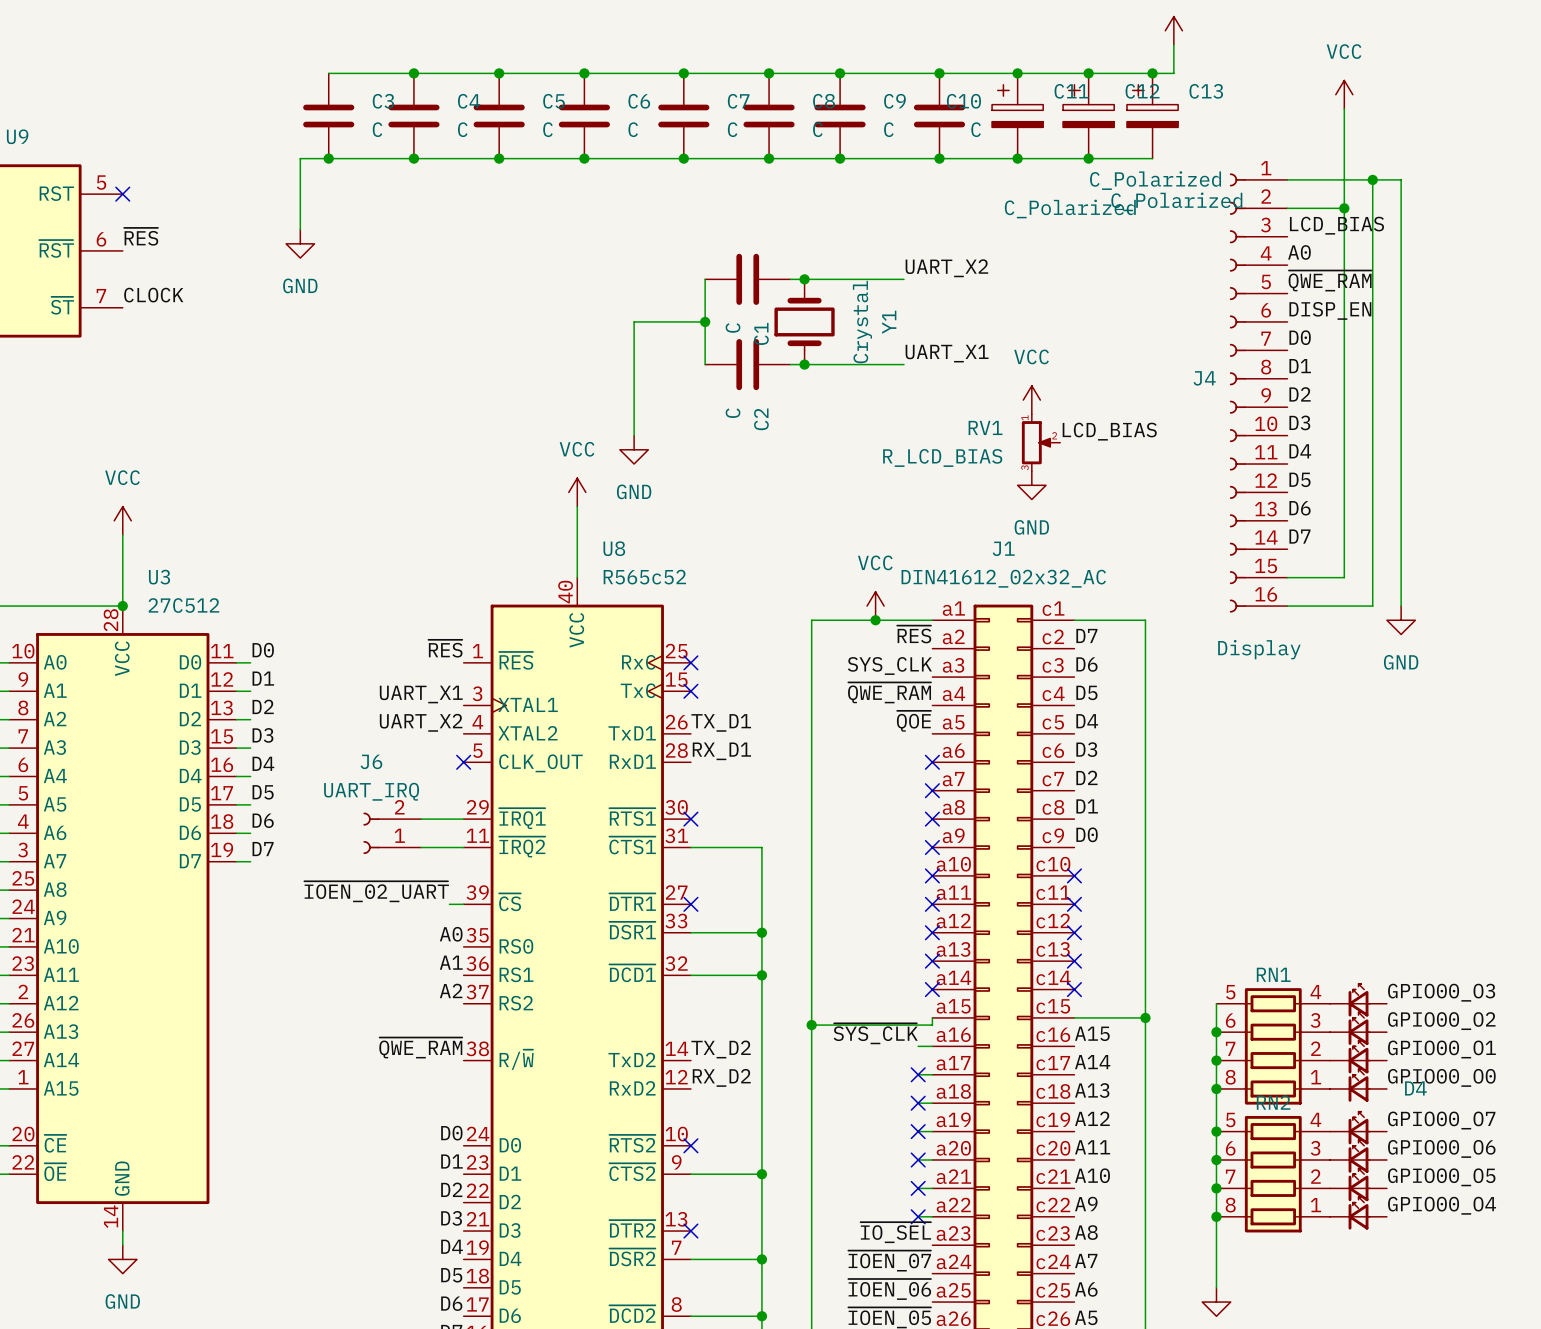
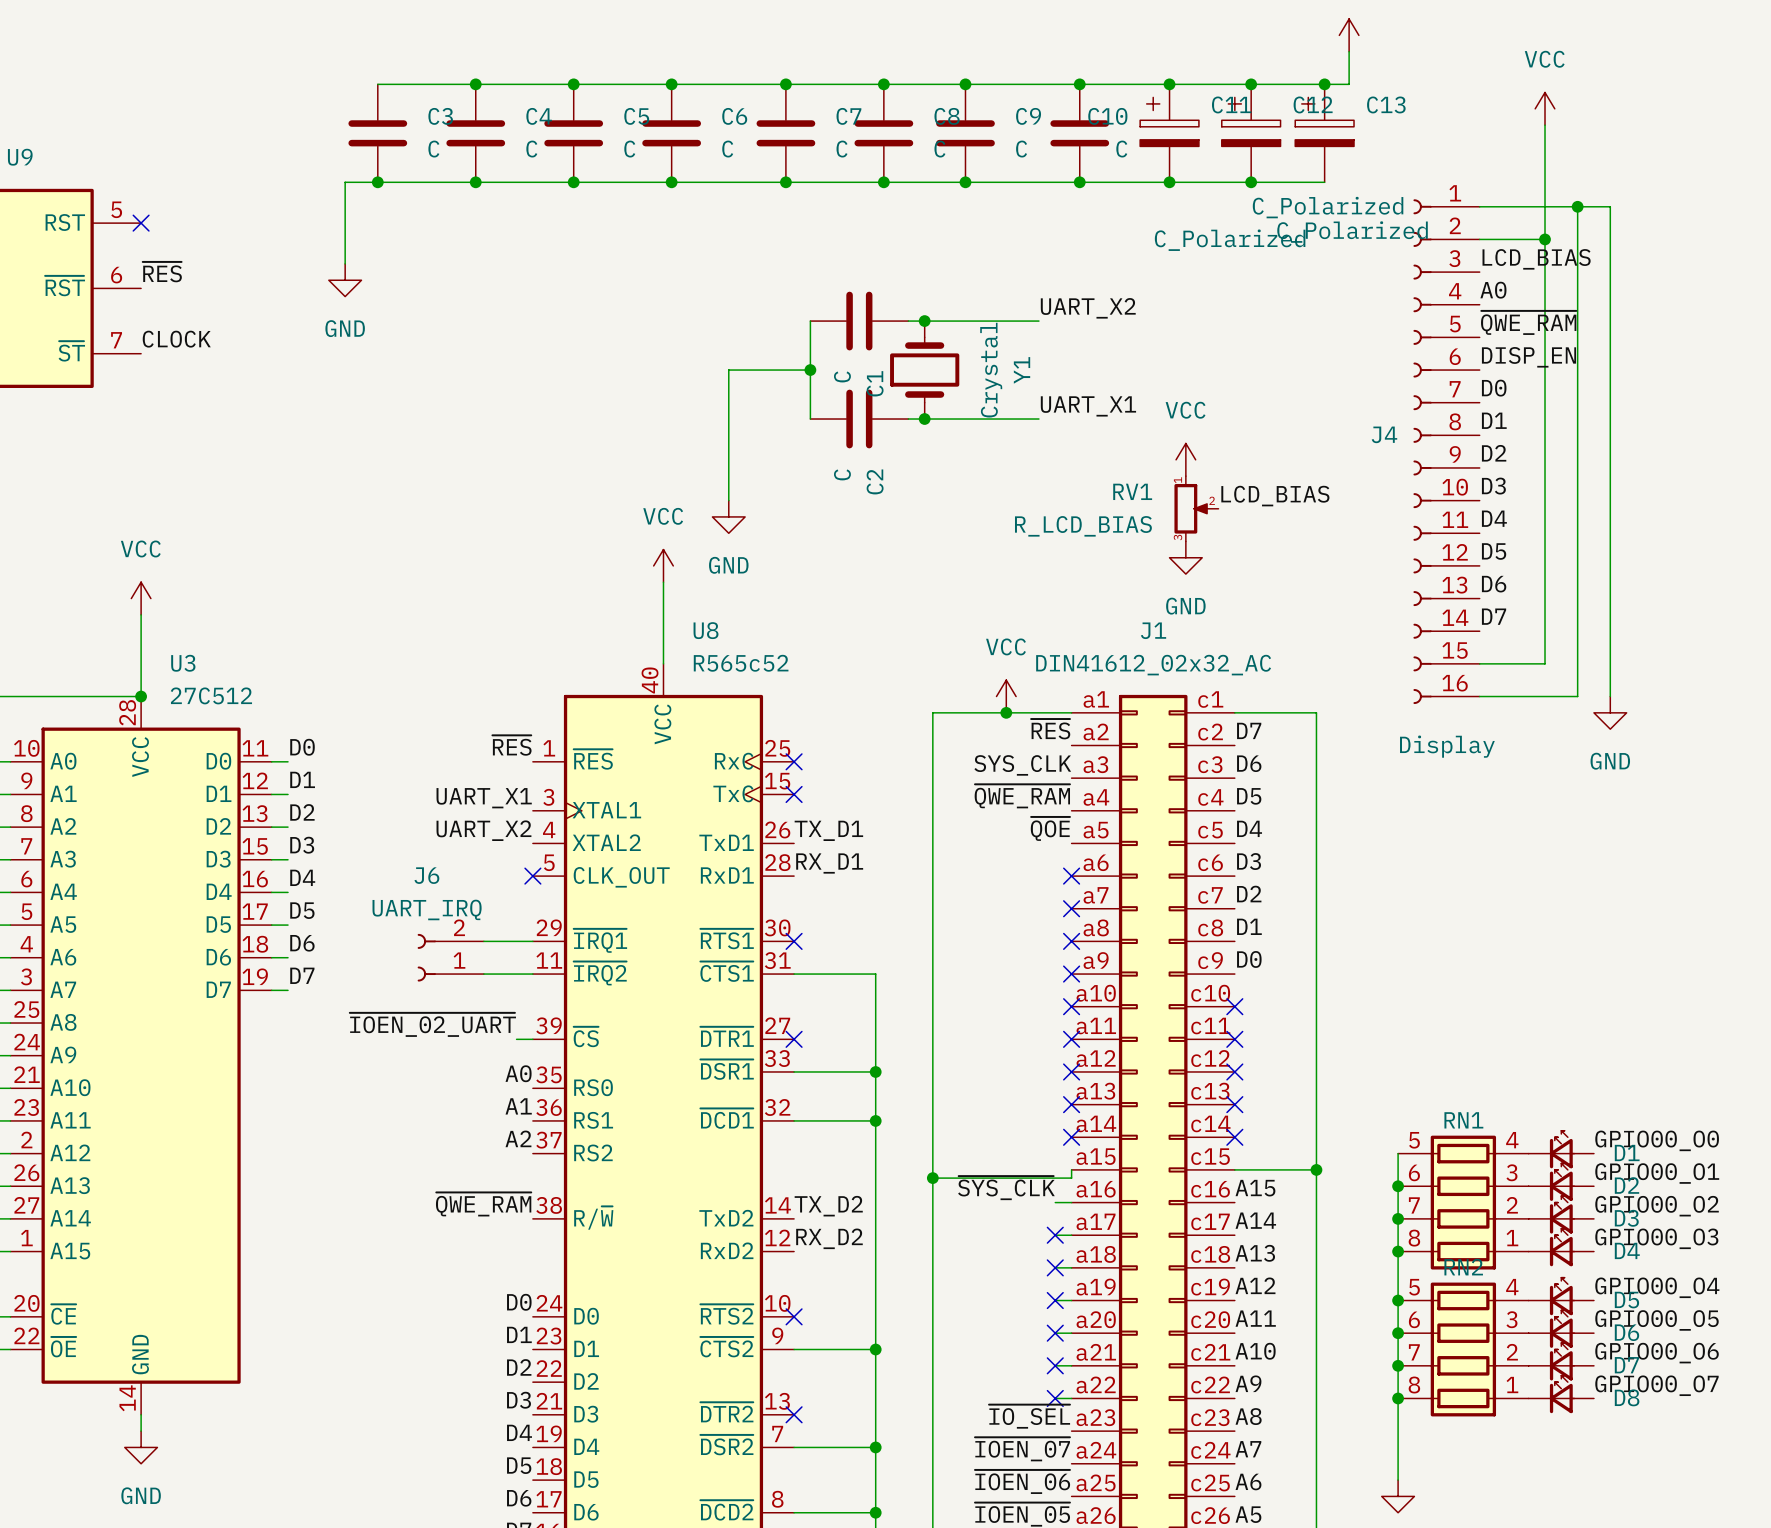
label: GPIO00_O3 (1441, 992) -> GPIO00_O0 (1657, 1140)
D1 name: none -> D1 (1627, 1153)
label: GPIO00_O2 (1441, 1021) -> GPIO00_O1 (1657, 1173)
D2 name: none -> D2 (1627, 1185)
label: GPIO00_O1 (1441, 1049) -> GPIO00_O2 (1657, 1206)
D3 name: none -> D3 (1626, 1218)
label: GPIO00_O0 (1441, 1077) -> GPIO00_O3 (1656, 1238)
label: GPIO00_O7 (1441, 1120) -> GPIO00_O4 (1657, 1287)
D5 name: none -> D5 (1626, 1300)
label: GPIO00_O6 (1441, 1148) -> GPIO00_O5 (1656, 1320)
D6 name: none -> D6 (1626, 1332)
label: GPIO00_O5 (1441, 1177) -> GPIO00_O6 (1657, 1353)
D7 name: none -> D7 (1626, 1365)
label: GPIO00_O4 (1442, 1205) -> GPIO00_O7 (1656, 1385)
D8 name: none -> D8 (1627, 1397)

